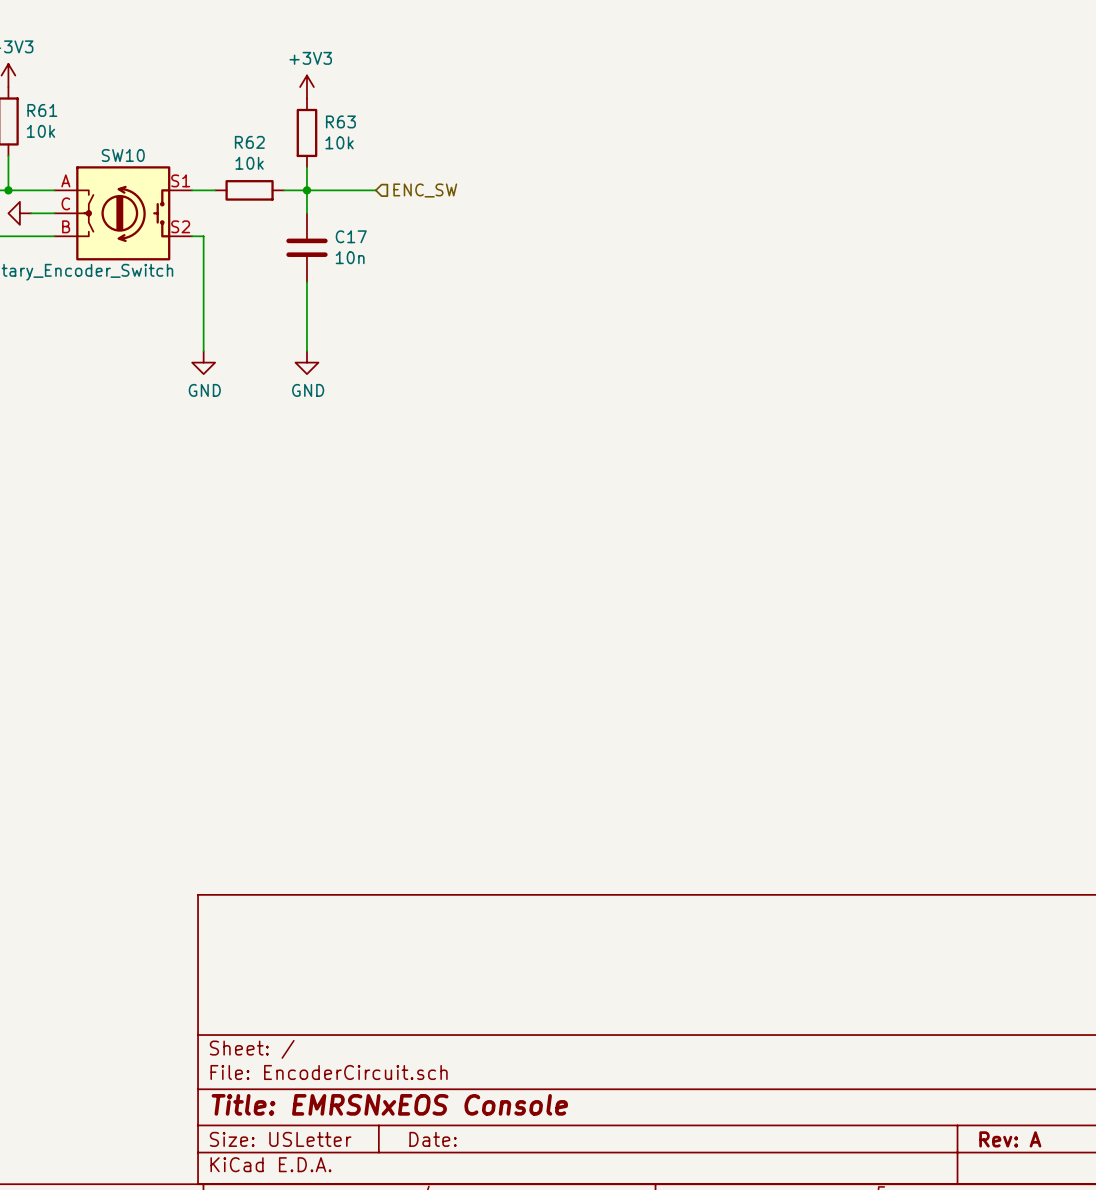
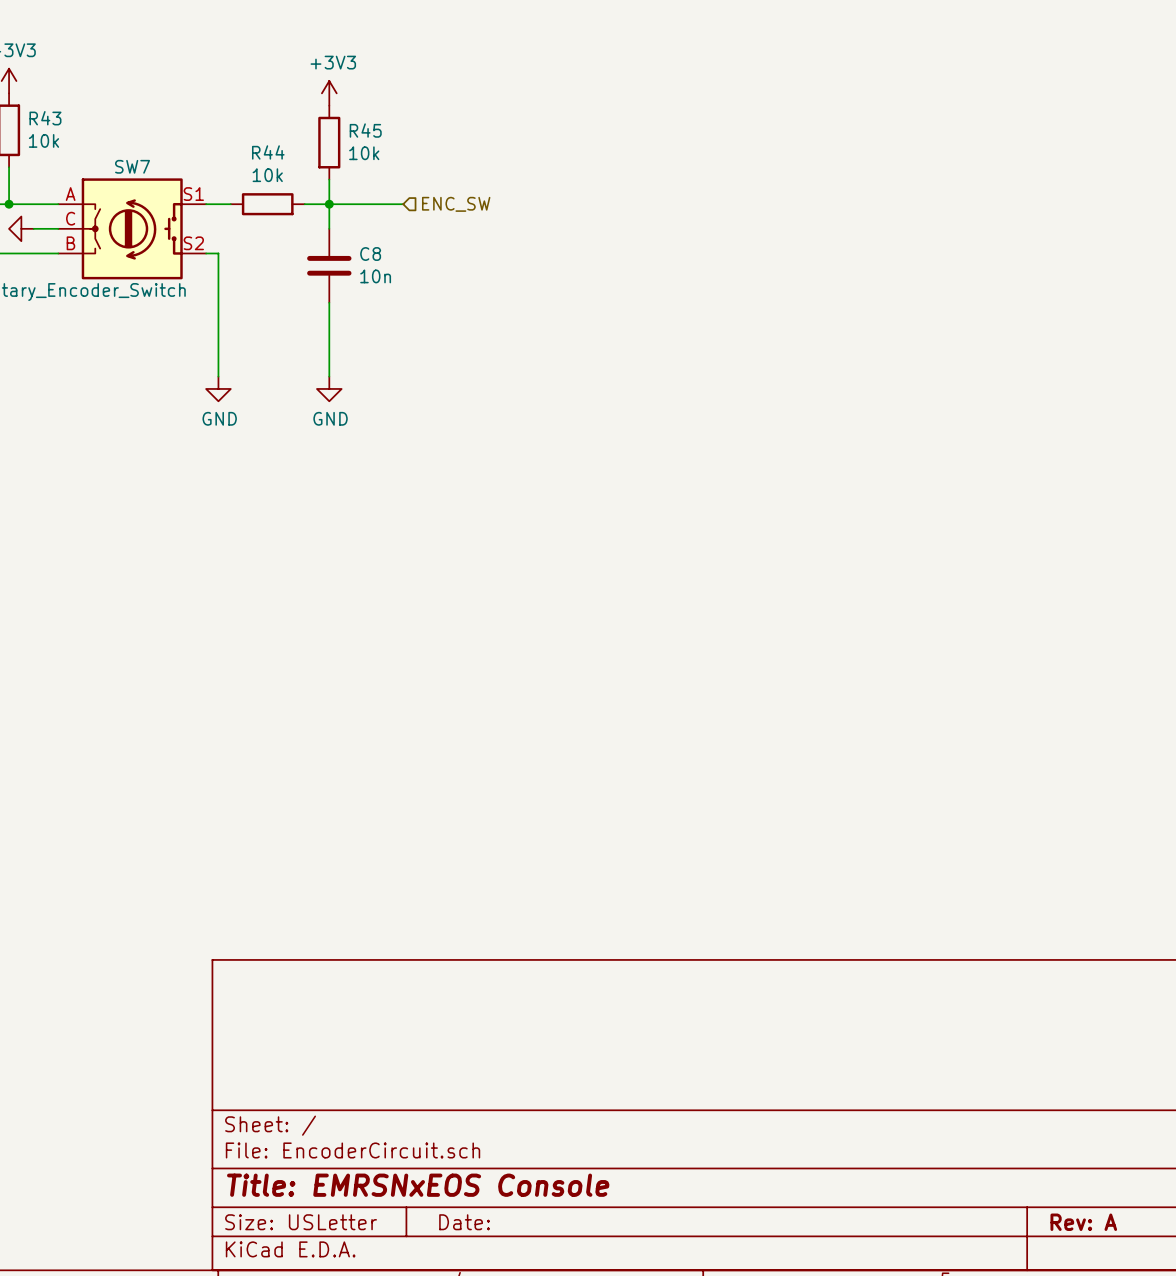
R61 name: R61 (42, 110) -> R43 (45, 118)
R63 name: R63 (340, 121) -> R45 (365, 130)
R62 name: R62 (249, 142) -> R44 (268, 152)
SW10 name: SW10 (123, 155) -> SW7 (132, 166)
C17 name: C17 (351, 236) -> C8 (370, 254)

